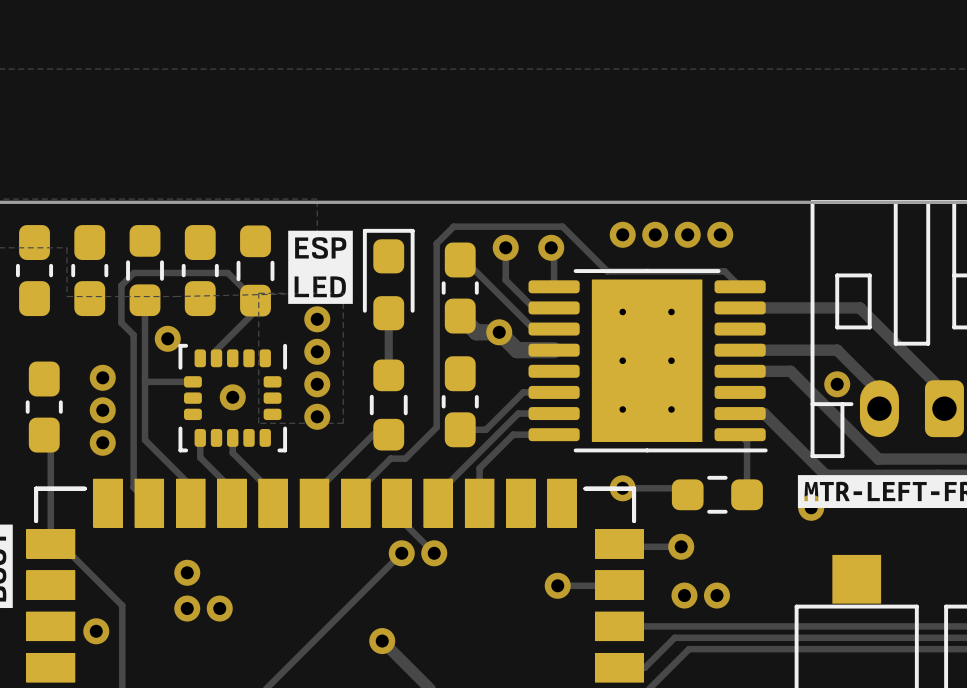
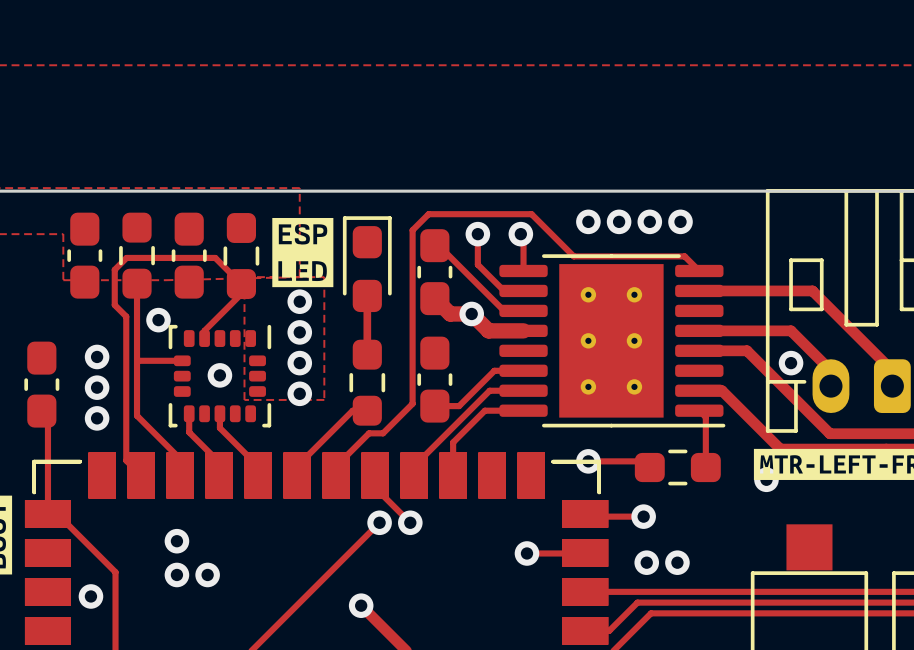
part: (34, 270) -> none

